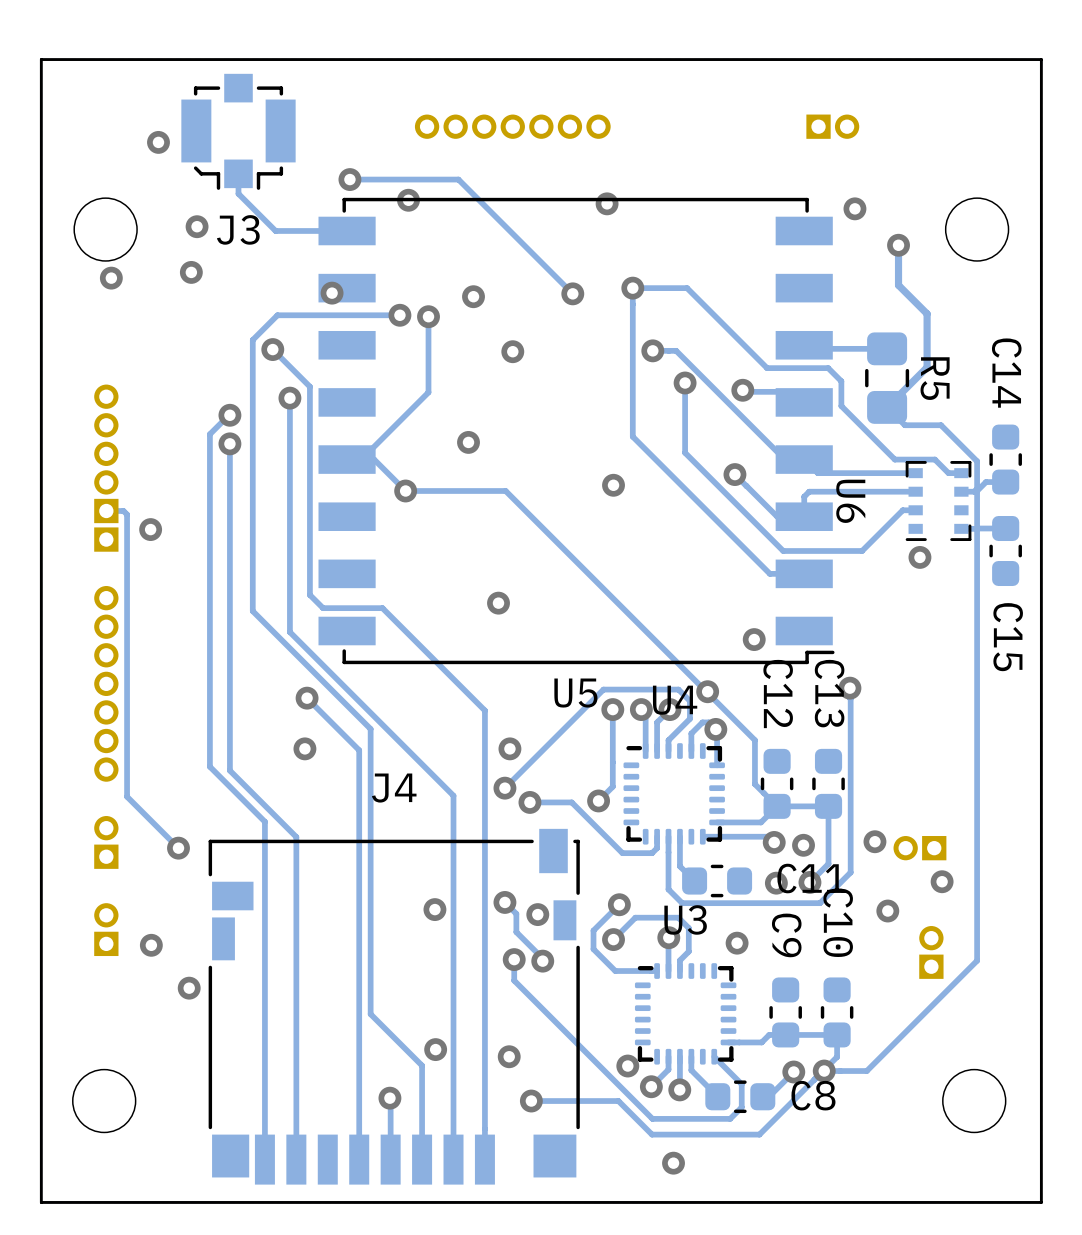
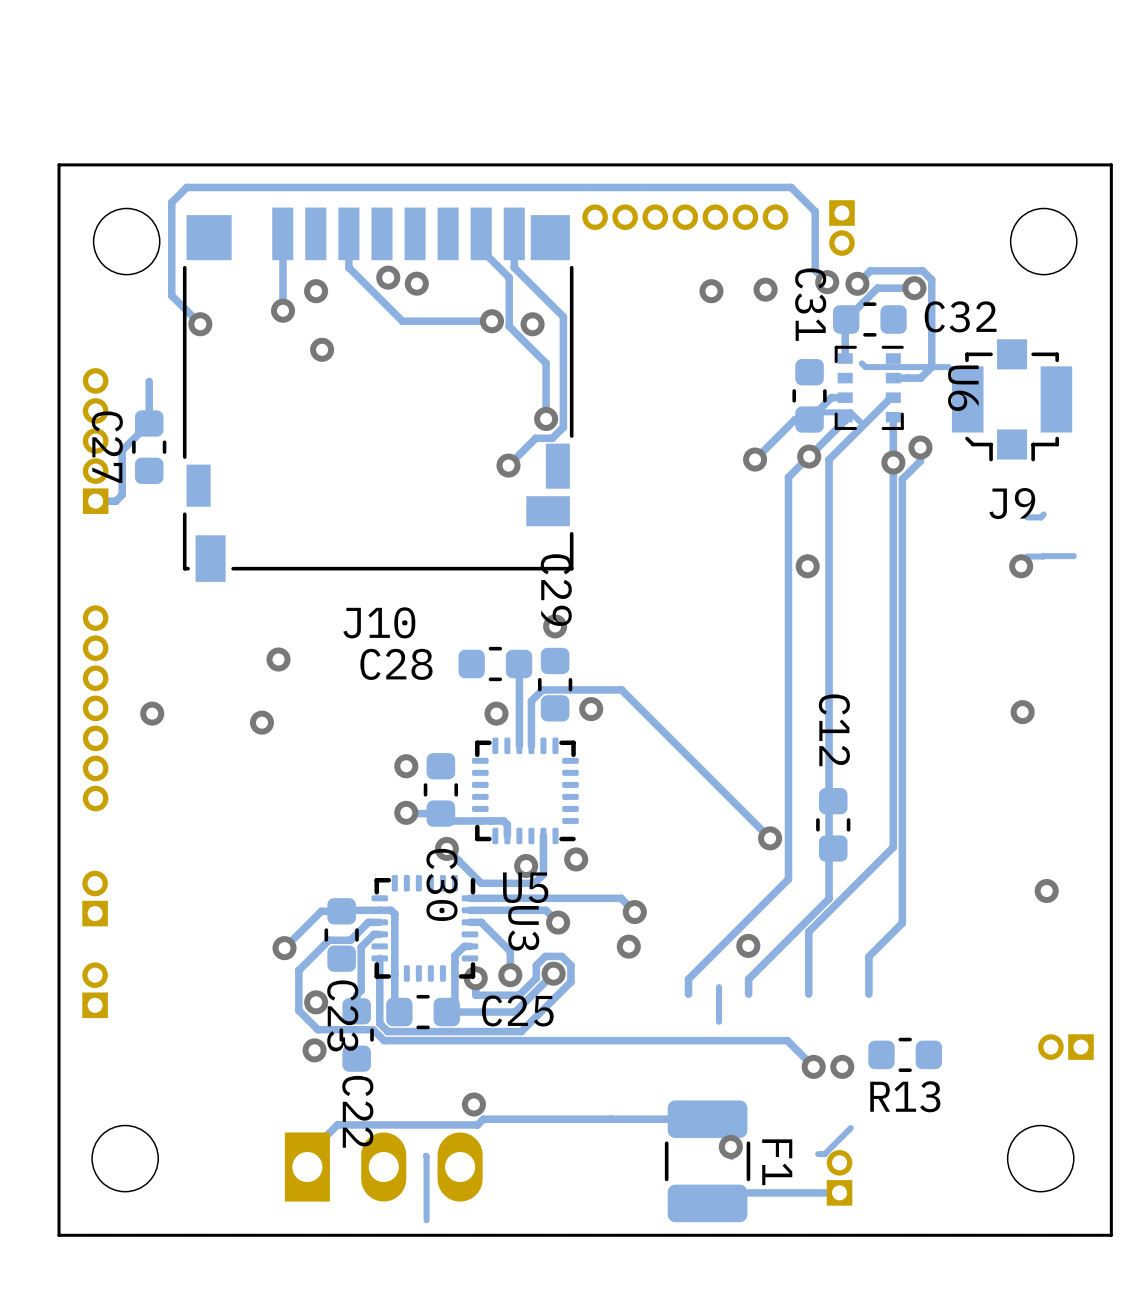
part position: (512, 126) -> (685, 217)
part rotation: 0° (832, 126) -> 90° clockwise (841, 228)
part position: (832, 126) -> (841, 228)
J3: (238, 131) -> none
via: (158, 142) -> none
board edge: (1041, 156) (1041, 59) (41, 59) (41, 156) -> (1111, 164) (59, 164)
track: (238, 173) (238, 193) (275, 230) (347, 230) -> none
track: (349, 179) (458, 179) (572, 293) -> none
via: (349, 179) -> none
U5 footprint: [318, 197, 835, 665] -> [472, 737, 579, 845]
via: (408, 200) -> none
via: (607, 203) -> none
via: (854, 208) -> none
track: none -> (283, 234) (283, 310)
track: none -> (348, 233) (348, 267) (402, 321) (491, 321)
track: none -> (481, 233) (481, 249) (509, 277) (509, 326) (546, 363) (546, 418)
track: none -> (514, 233) (514, 267) (563, 316) (563, 427) (552, 438) (535, 438) (513, 461)
via: (197, 226) -> none
track: (898, 245) (898, 285) (927, 313) (927, 367) (887, 407) (904, 425) (941, 425) (977, 461) (977, 960) (866, 1071) (823, 1071) -> none
via: (898, 245) -> none
via: none -> (388, 277)
track: none -> (827, 282) (815, 270) (815, 211) (791, 187) (186, 187) (171, 202) (171, 295) (200, 324)
via: none -> (827, 282)
via: none -> (416, 283)
track: none -> (857, 283) (870, 270) (922, 270) (931, 279) (931, 367) (920, 378) (893, 378)
via: none -> (857, 283)
via: (191, 272) -> none
track: none -> (914, 288) (877, 288) (845, 320) (845, 358)
via: none -> (914, 288)
via: none -> (765, 289)
via: none -> (316, 291)
via: (111, 278) -> none
via position: (632, 288) -> (711, 291)
via: (332, 293) -> none
via: (572, 293) -> none
via: none -> (283, 310)
via: (473, 296) -> none
C32: none -> (869, 319)
via: none -> (491, 321)
via: none -> (200, 324)
via: none -> (532, 324)
track: (399, 315) (277, 315) (252, 339) (252, 611) (370, 729) (370, 1014) (422, 1065) (422, 1159) -> none
via: (399, 315) -> none
track: (428, 316) (428, 392) (361, 459) -> none
via: (428, 316) -> none
track: (272, 349) (309, 386) (309, 595) (323, 608) (382, 608) (484, 710) (484, 1159) -> none
via position: (272, 349) -> (322, 349)
track: (652, 350) (676, 350) (784, 459) (804, 459) (817, 473) (915, 473) -> none
via: (652, 350) -> none
via: (512, 351) -> none
track: none -> (149, 381) (149, 423) (122, 450) (122, 494) (115, 501) (95, 501)
J10: none -> (378, 394)
C31: none -> (809, 395)
track: none -> (845, 397) (831, 397) (809, 419) (795, 419) (755, 459)
track: none -> (893, 397) (891, 397) (829, 459) (829, 898) (748, 979) (748, 994)
R5: (887, 378) -> none
J9: none -> (1012, 400)
track: (685, 382) (685, 452) (783, 551) (862, 551) (902, 510) (915, 510) -> none
via: (685, 382) -> none
via: (742, 390) -> none
track: none -> (845, 417) (845, 420) (788, 477) (788, 879) (688, 979) (688, 994)
track: none -> (893, 417) (893, 847) (808, 931) (808, 994)
track: (289, 398) (289, 632) (453, 795) (453, 1159) -> none
via: (289, 398) -> none
via: none -> (546, 418)
track: (229, 415) (209, 434) (209, 766) (264, 821) (264, 1159) -> none
via: (229, 415) -> none
part: none -> (95, 441)
C27: none -> (149, 447)
track: none -> (920, 447) (920, 461) (902, 479) (902, 923) (868, 956) (868, 994)
via: none -> (920, 447)
via: none -> (809, 456)
via: none -> (755, 459)
via: none -> (893, 462)
track: (229, 443) (229, 770) (296, 837) (296, 1159) -> none
via: (229, 443) -> none
track: (347, 459) (374, 459) (405, 490) (505, 490) (754, 740) (754, 784) (777, 806) -> none
C14: (1005, 459) -> none
part: (106, 468) -> none
track: (961, 473) (948, 473) (934, 459) (894, 459) (841, 406) (841, 381) (828, 368) (767, 368) (687, 288) (632, 288) (632, 436) (769, 573) (804, 573) -> none
track: (734, 474) (777, 516) (804, 516) (804, 496) (809, 491) (915, 491) -> none
via: (734, 474) -> none
track: (1005, 482) (986, 482) (977, 490) -> none
via: (613, 485) -> none
via: (405, 490) -> none
U6 rotation: 0° (938, 500) -> 180° (869, 387)
U6 position: (938, 500) -> (869, 387)
track: (106, 511) (123, 511) (127, 514) (127, 796) (178, 848) -> none
via: (150, 529) -> none
via: none -> (807, 566)
C15: (1005, 551) -> none
via position: (919, 557) -> (1021, 566)
via position: (498, 603) -> (555, 626)
via: none -> (278, 659)
C28: none -> (495, 664)
track: none -> (519, 664) (519, 745)
via: (754, 639) -> none
C29: none -> (555, 684)
via: none -> (591, 709)
via: none -> (1022, 712)
via: none -> (152, 713)
via: none -> (496, 713)
part position: (106, 683) -> (95, 708)
via: none -> (261, 722)
track: (849, 688) (850, 872) (820, 903) (682, 903) (668, 889) (668, 836) -> none
via: (849, 688) -> none
via: (707, 691) -> none
U5 name position: U5 (575, 693) -> U5 (525, 887)
track: (307, 698) (359, 750) (359, 1159) -> none
via: (307, 698) -> none
track: none -> (531, 745) (531, 701) (542, 689) (621, 689) (770, 838)
track: (612, 709) (612, 786) (598, 800) -> none
via: (612, 709) -> none
track: (641, 709) (645, 713) (645, 751) -> none
via: (641, 709) -> none
track: (669, 709) (657, 722) (657, 751) -> none
via: (669, 709) -> none
via: none -> (406, 766)
track: (715, 729) (708, 722) (702, 722) (691, 733) (691, 751) -> none
via: (715, 729) -> none
track: (717, 736) (717, 765) -> none
via: (304, 748) -> none
via: (509, 748) -> none
C30: none -> (440, 789)
track: (668, 751) (668, 740) (689, 718) (689, 701) (678, 689) (603, 689) (504, 788) -> none
track: none -> (406, 812) (440, 813) (448, 820) (503, 820) (507, 824) (507, 835)
via: none -> (406, 812)
C13: (828, 783) -> none
via: (504, 788) -> none
U4: (674, 793) -> none
track: none -> (543, 835) (543, 874) (534, 883) (481, 883) (446, 848)
via: none -> (770, 838)
via: (598, 800) -> none
track: (529, 802) (571, 802) (622, 853) (652, 853) (657, 848) (657, 836) -> none
via position: (529, 802) -> (576, 859)
via: none -> (446, 848)
track: (777, 806) (761, 822) (717, 822) -> none
track: (777, 806) (828, 806) (828, 863) (809, 882) -> none
via: none -> (526, 866)
track: (679, 836) (679, 866) (694, 881) -> none
track: (702, 836) (768, 836) (774, 842) -> none
via: (874, 841) -> none
part position: (106, 842) -> (95, 898)
via: (774, 842) -> none
via: (803, 845) -> none
via: (178, 848) -> none
part: (919, 848) -> none
track: none -> (469, 898) (621, 898) (634, 912)
track: none -> (469, 910) (545, 910) (558, 922)
via: none -> (634, 912)
track: none -> (379, 922) (368, 922) (350, 940) (329, 940) (298, 970) (298, 1010) (317, 1029) (373, 1029) (384, 1040) (787, 1040) (813, 1066)
track: none -> (469, 922) (481, 922) (510, 951) (510, 975)
via: none -> (558, 922)
C11: (717, 881) -> none
via position: (942, 881) -> (1046, 891)
via: (809, 882) -> none
via: (776, 883) -> none
track: none -> (379, 934) (373, 934) (361, 947) (361, 990) (356, 995) (356, 1011)
C23: none -> (341, 934)
via: none -> (748, 945)
track: none -> (469, 946) (464, 946) (454, 955) (454, 1003) (446, 1012) (515, 1012) (553, 973)
via: none -> (628, 946)
track: none -> (284, 948) (321, 911) (391, 910) (394, 914) (394, 1007) (399, 1012)
via: none -> (284, 948)
track: (504, 902) (516, 913) (516, 932) (542, 958) (542, 961) -> none
via position: (504, 902) -> (553, 973)
track: (619, 904) (593, 930) (593, 949) (615, 971) (657, 971) -> none
via: (619, 904) -> none
via position: (434, 909) -> (475, 978)
track: none -> (379, 958) (379, 1023) (387, 1031) (521, 1031) (570, 982) (570, 965) (561, 956) (545, 956) (536, 965) (536, 978) (519, 995) (475, 995) (475, 978)
via: (887, 911) -> none
via: (537, 914) -> none
via: none -> (510, 975)
part position: (106, 929) -> (95, 990)
via: (668, 937) -> none
track: (613, 939) (635, 917) (678, 917) (688, 928) (688, 951) (679, 960) (679, 971) -> none
via: (613, 939) -> none
via: (737, 943) -> none
via: (151, 945) -> none
via: none -> (316, 1002)
part rotation: 0° (931, 952) -> 90° counterclockwise (1065, 1047)
part position: (931, 952) -> (1065, 1047)
track: (514, 959) (514, 980) (652, 1118) (730, 1118) (741, 1107) (741, 1084) (714, 1056) -> none
via: (514, 959) -> none
C25: none -> (423, 1012)
via: (542, 961) -> none
C22: none -> (356, 1034)
via: (189, 988) -> none
via: none -> (314, 1050)
R13: none -> (905, 1054)
J4: (394, 1006) -> none
C9: (785, 1012) -> none
C10: (837, 1012) -> none
U3 rotation: 0° (685, 1013) -> 90° clockwise (424, 928)
U3 position: (685, 1013) -> (424, 928)
via: none -> (813, 1066)
via: none -> (842, 1066)
track: (728, 1042) (761, 1042) (769, 1034) (837, 1034) (837, 1056) (759, 1134) (652, 1134) (618, 1101) (531, 1101) -> none
via: (509, 1056) -> none
track: (668, 1056) (668, 1069) (651, 1086) -> none
track: (679, 1056) (679, 1089) -> none
track: (691, 1056) (691, 1070) (717, 1096) -> none
via: (627, 1066) -> none
via: (824, 1071) -> none
via: (793, 1072) -> none
via: (651, 1086) -> none
C8: (740, 1096) -> none
via: (389, 1098) -> none
track: none -> (731, 1156) (731, 1143) (707, 1119) (483, 1119) (477, 1124) (337, 1124) (307, 1155) (307, 1167)
via: (531, 1101) -> none
F1: none -> (707, 1161)
part: none -> (383, 1167)
part: none -> (839, 1177)
track: none -> (839, 1192) (718, 1192) (707, 1203)
via: (673, 1163) -> none
board edge: (1041, 1173) (1041, 1202) (41, 1202) (41, 1173) -> (1111, 1235) (59, 1235)

